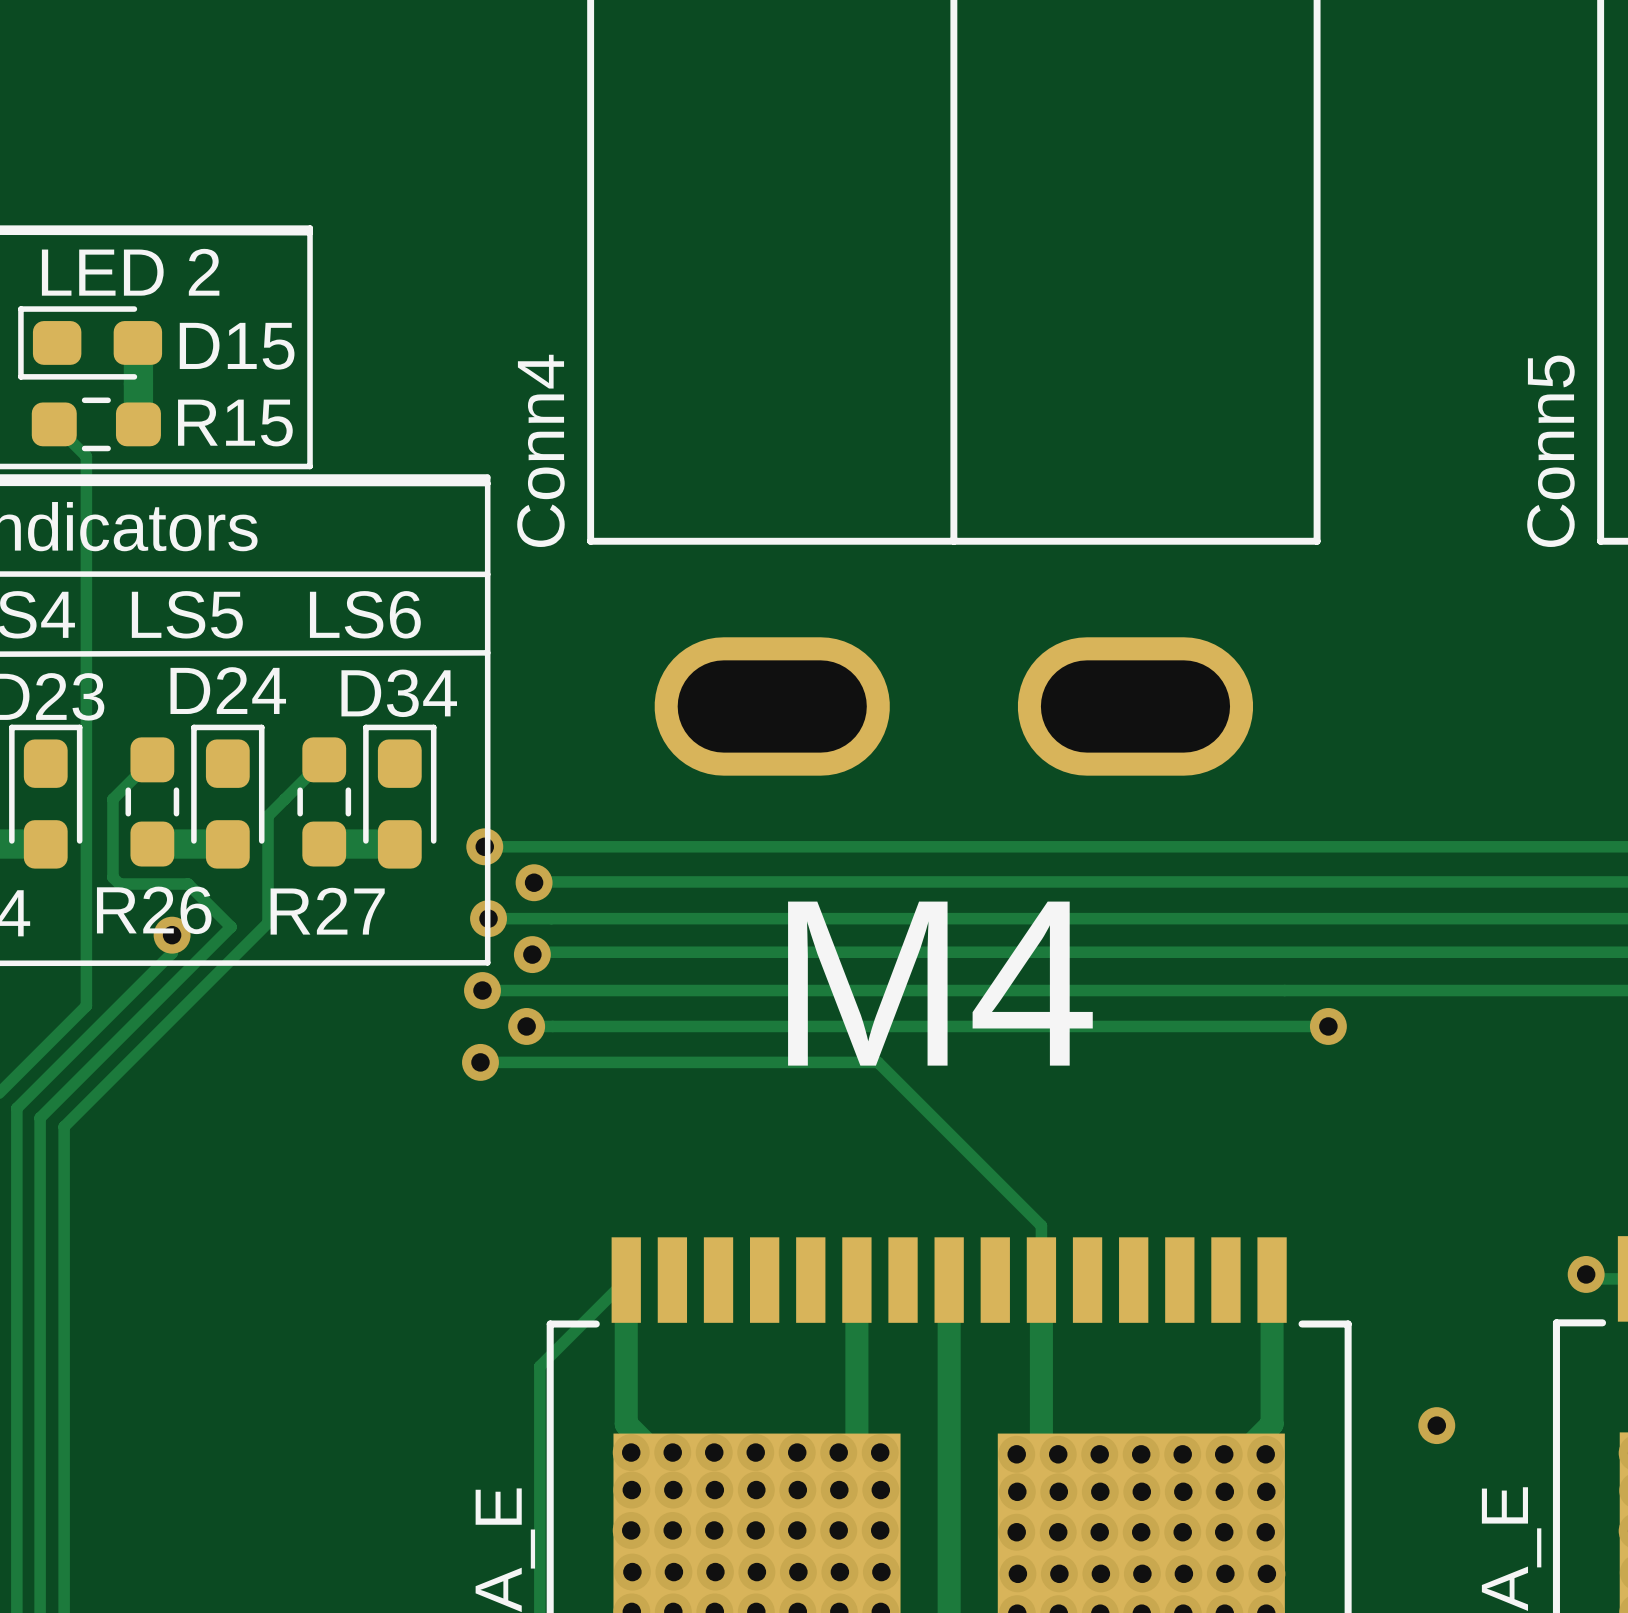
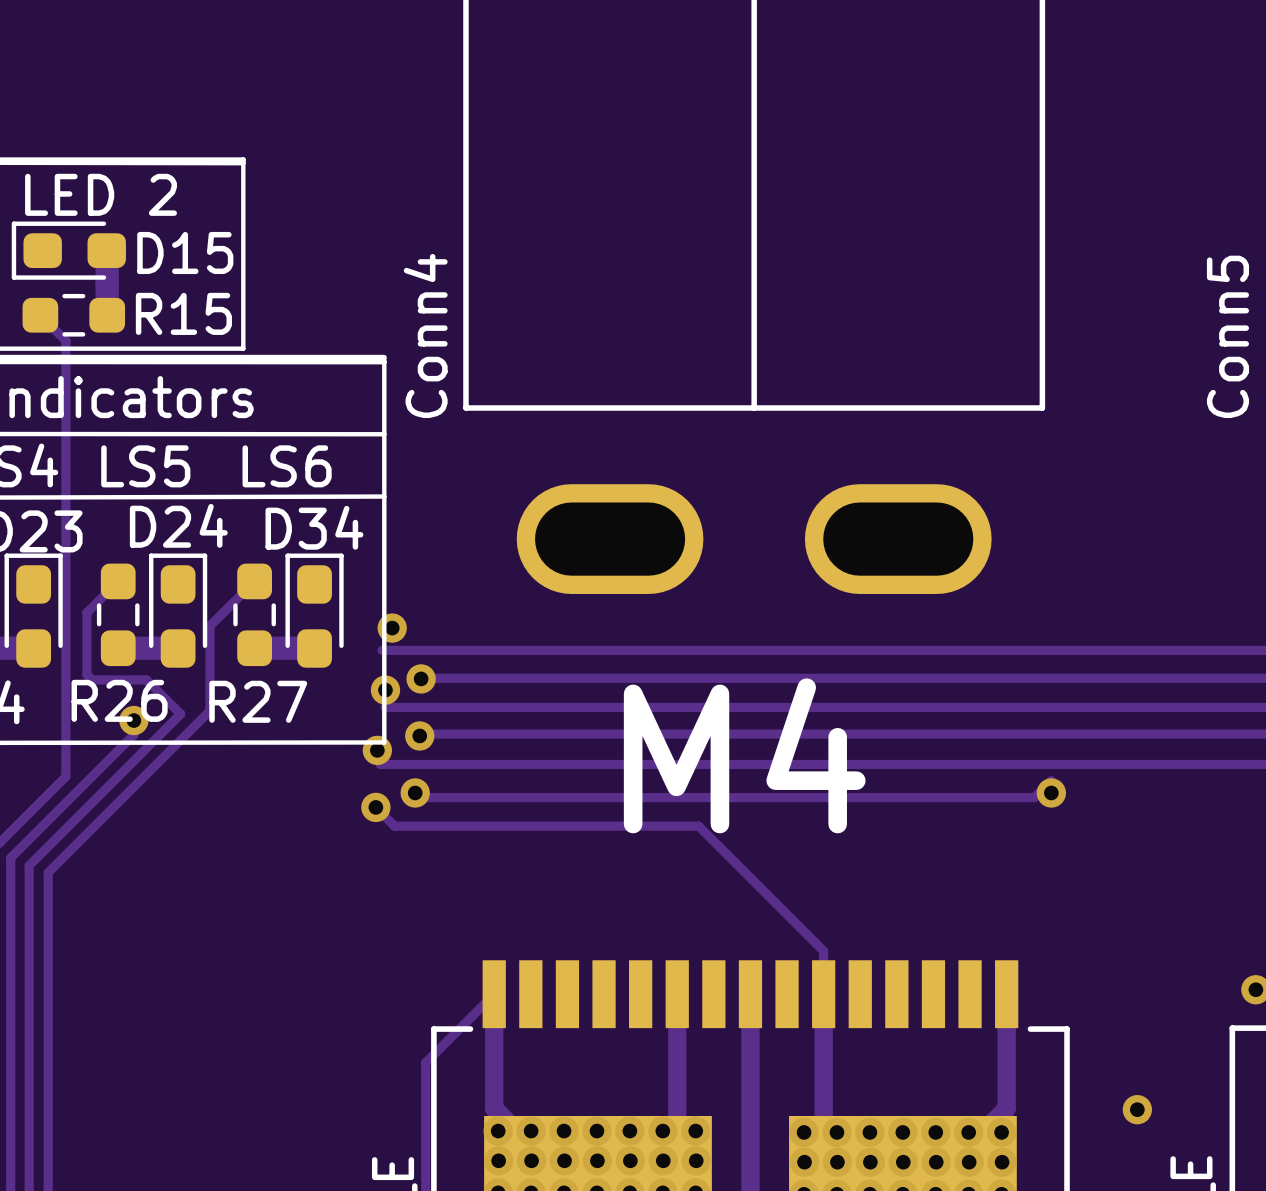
via position: (484, 846) -> (392, 628)
via position: (488, 918) -> (385, 690)
via position: (482, 990) -> (377, 750)
track: none -> (1051, 780) (1034, 797) (413, 797)
track: (526, 1026) (1328, 1026) -> none
track: (480, 1062) (878, 1062) (883, 1068) -> (375, 807) (394, 826) (698, 826)
via position: (480, 1062) -> (375, 807)

